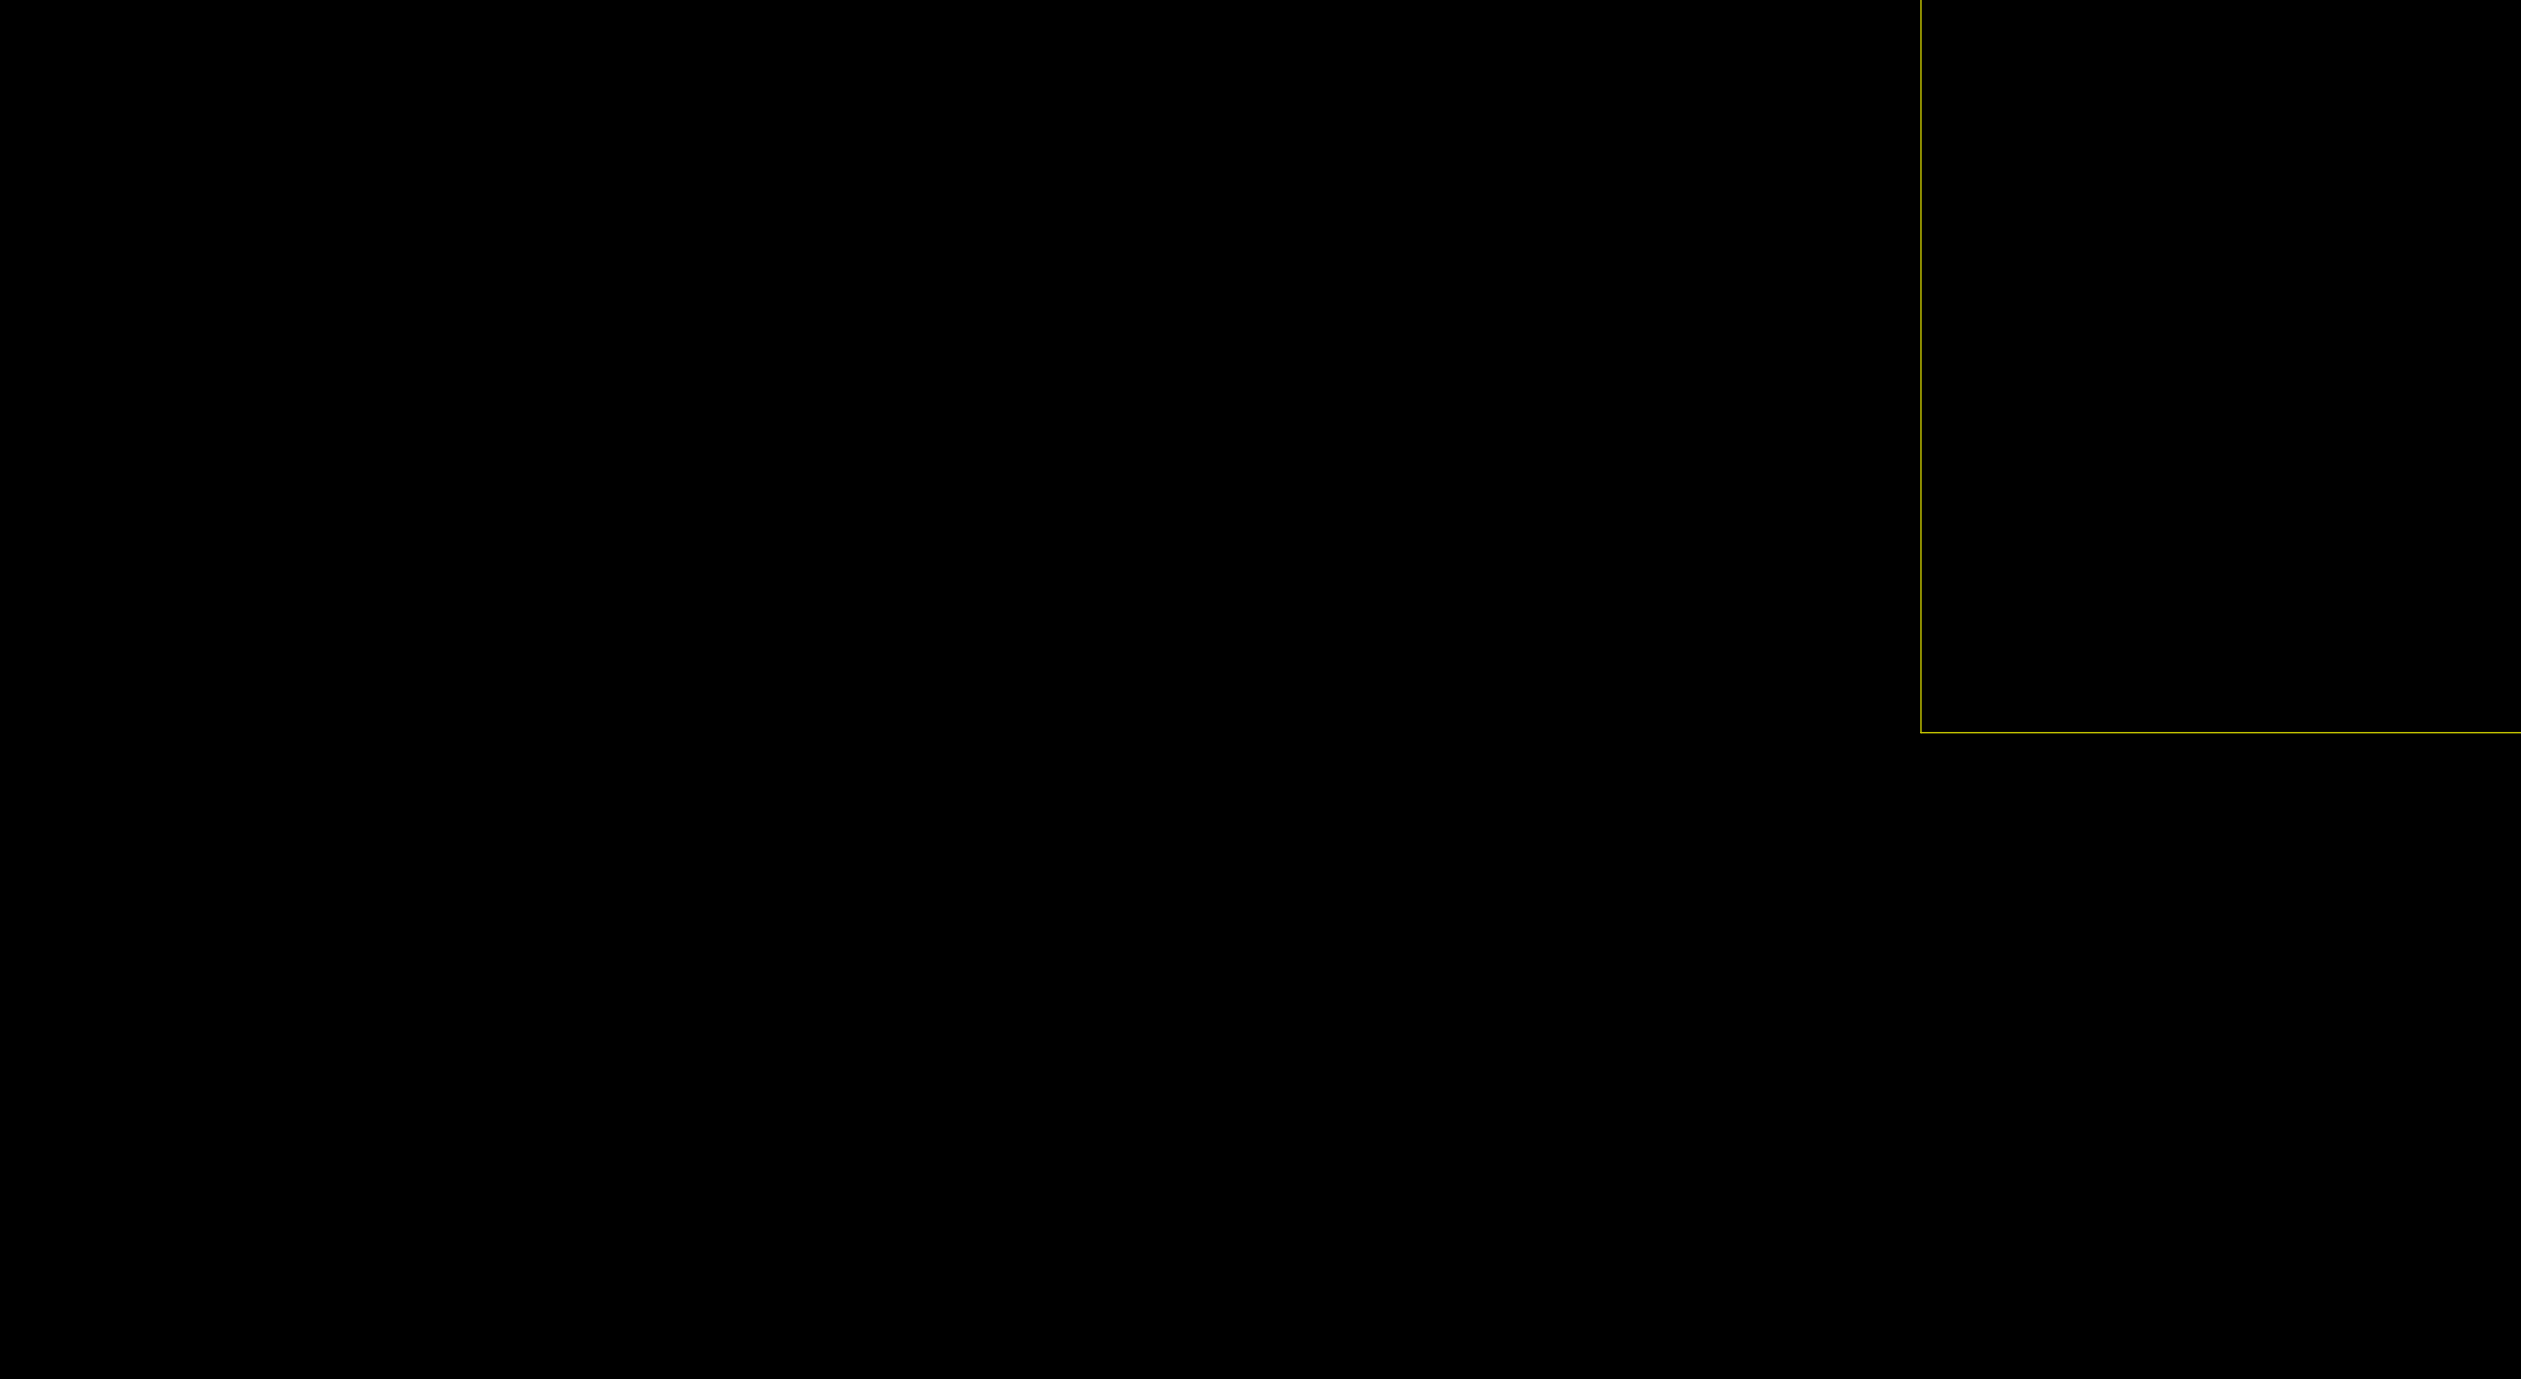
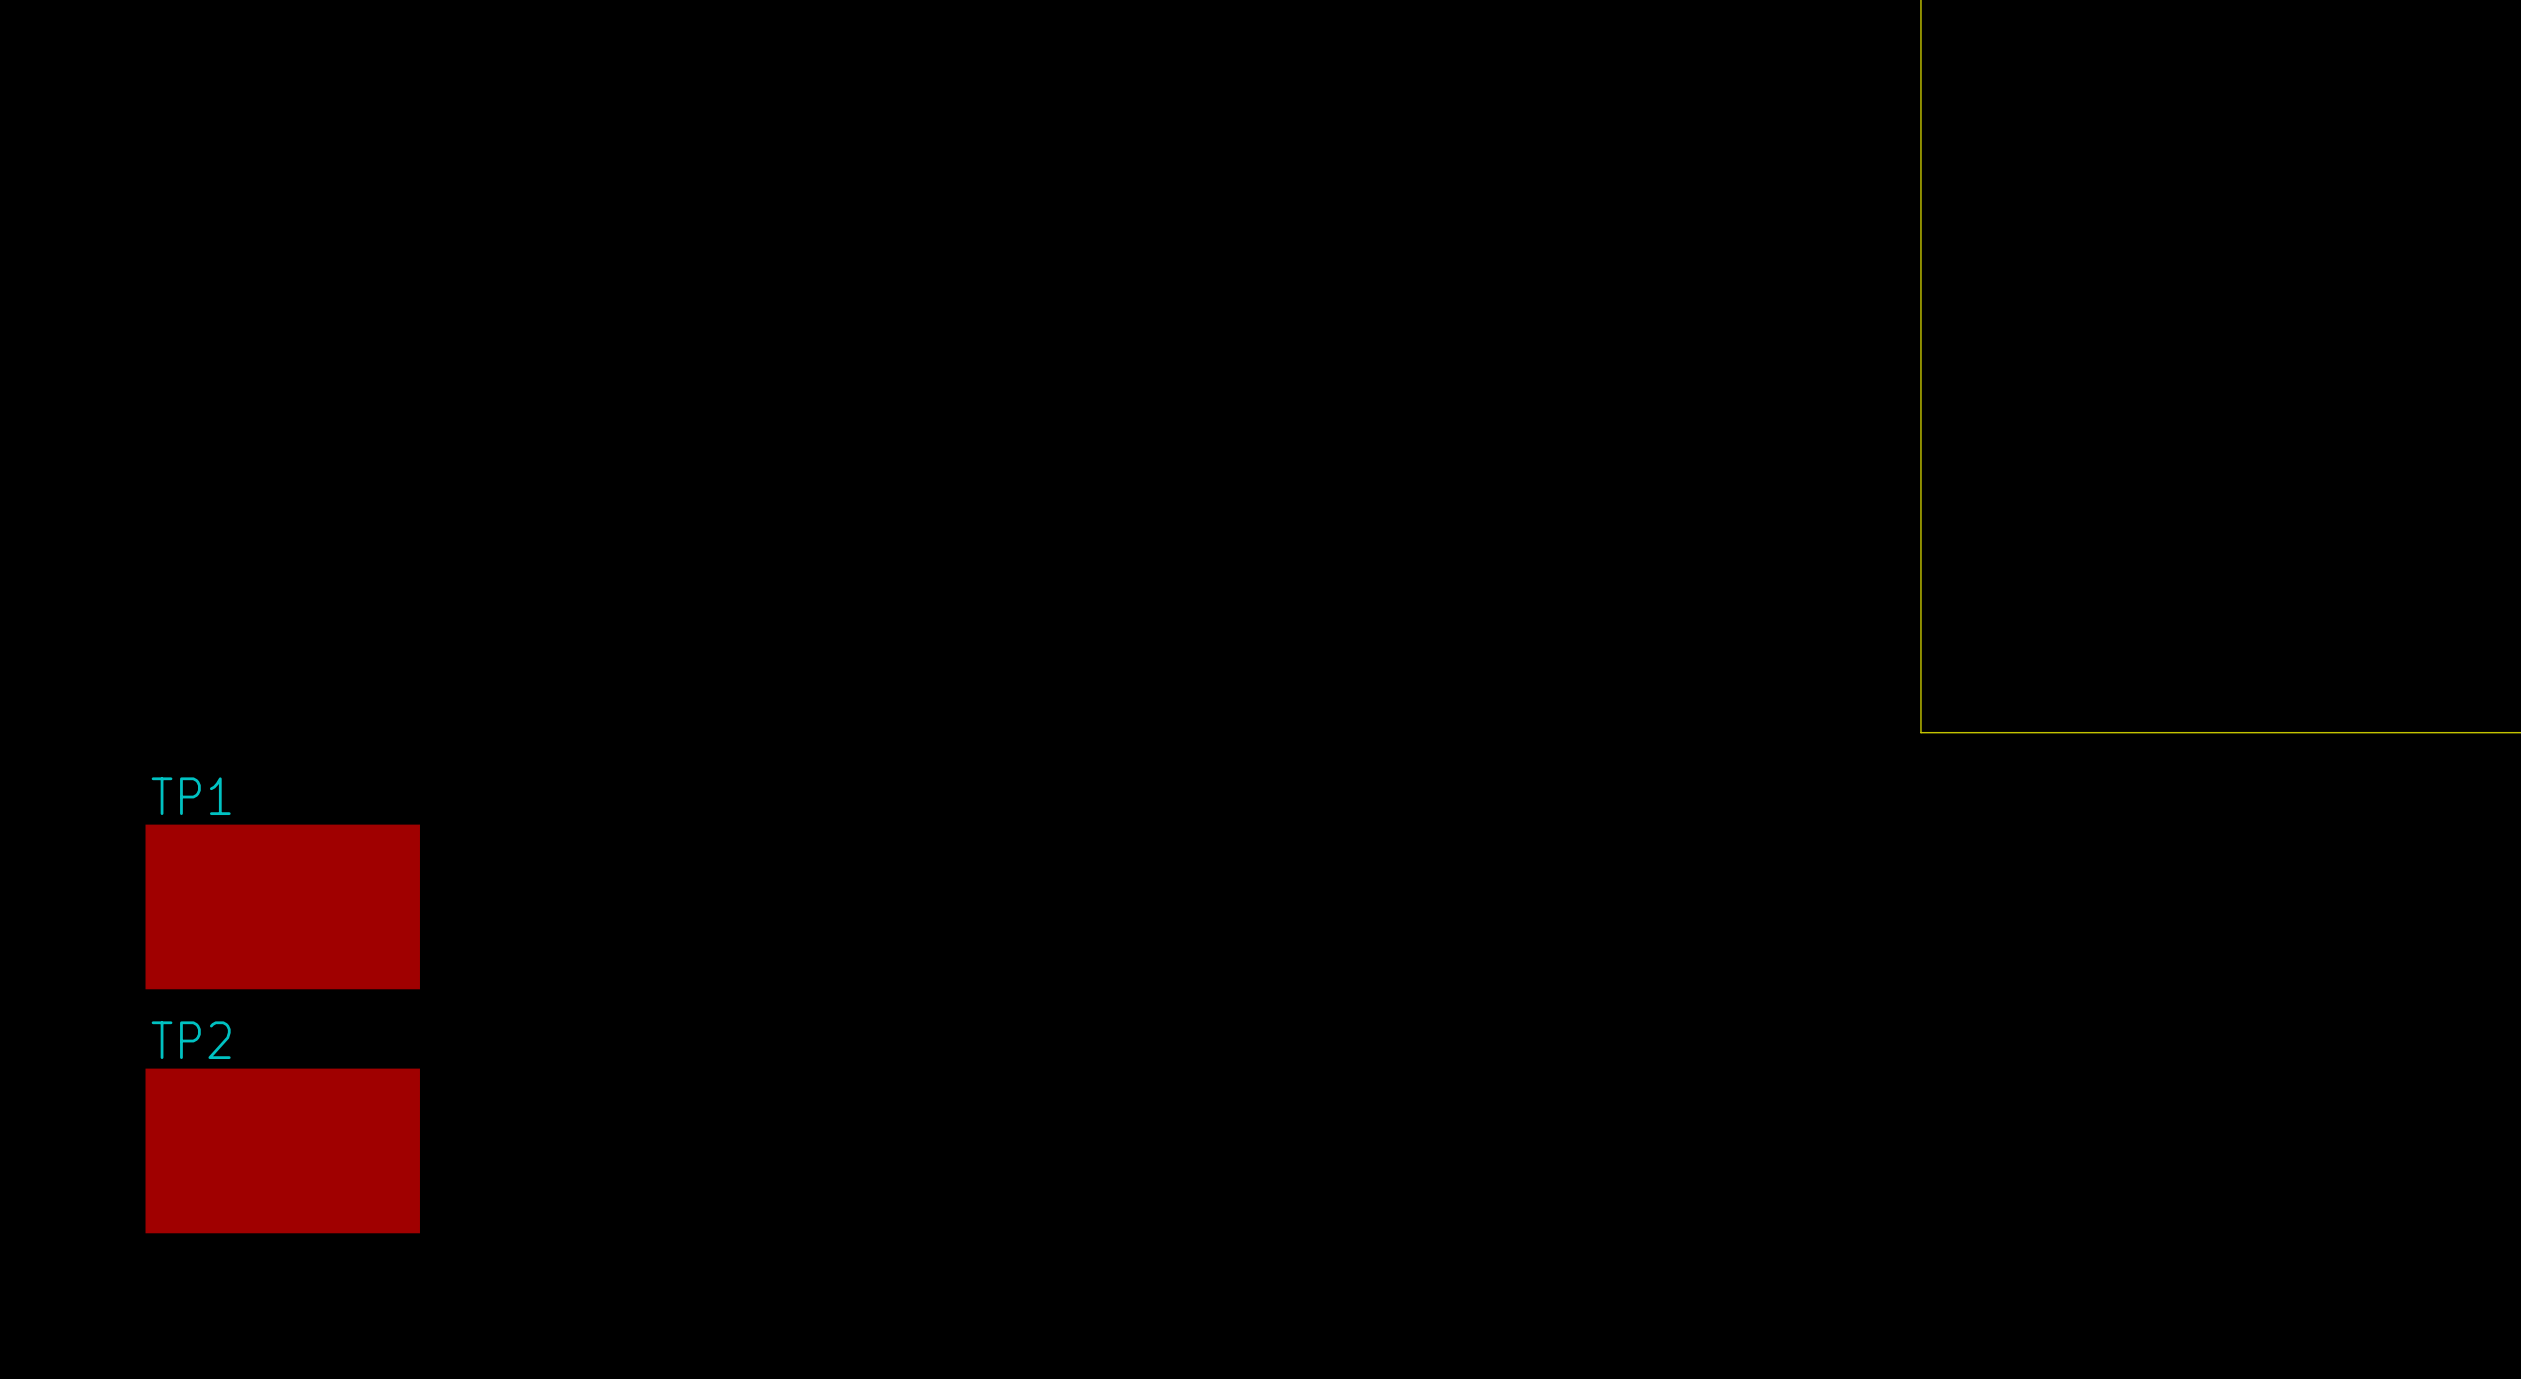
TP1: none -> (282, 906)
TP2: none -> (282, 1150)

